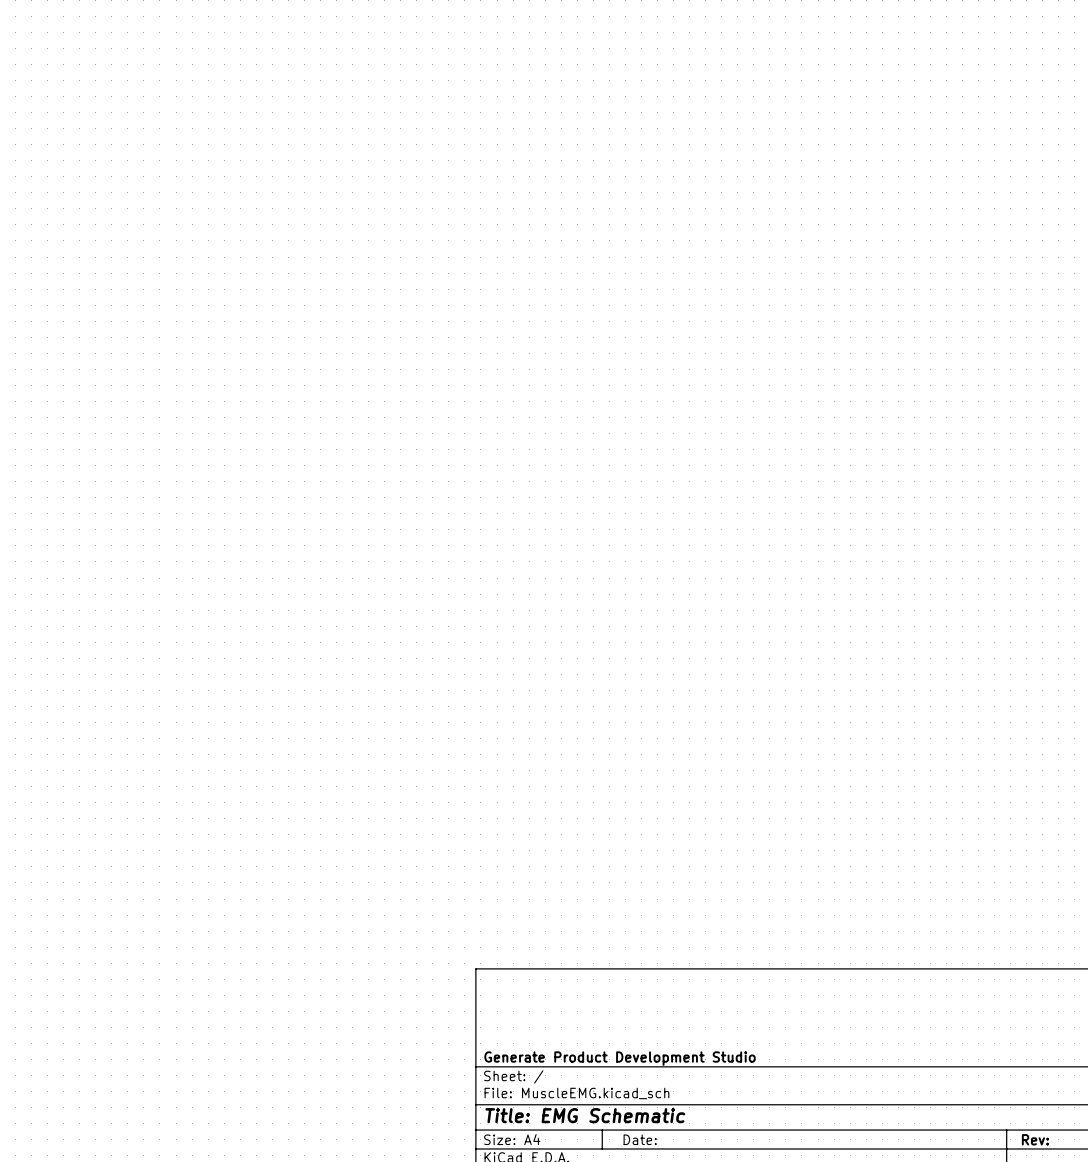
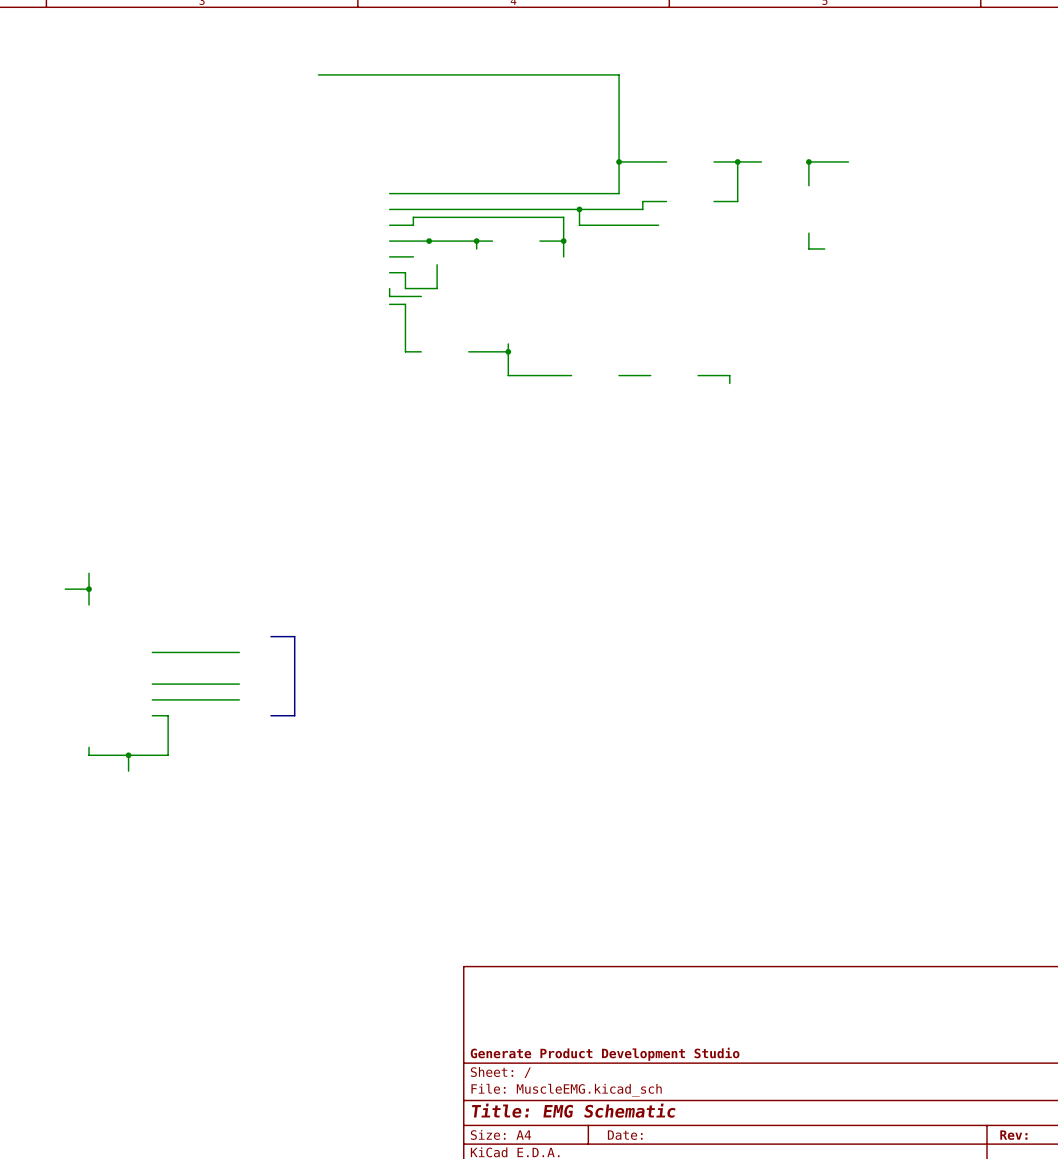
wire: none -> (318, 74) (619, 74) (619, 193) (389, 193)
wire: none -> (619, 161) (666, 161)
junction: none -> (619, 161)
wire: none -> (713, 161) (761, 161)
wire: none -> (737, 161) (737, 201) (713, 201)
junction: none -> (737, 161)
junction: none -> (808, 161)
wire: none -> (848, 161) (808, 161) (808, 185)
wire: none -> (666, 201) (642, 201) (642, 209) (389, 209)
wire: none -> (579, 209) (579, 225) (658, 225)
junction: none -> (579, 209)
wire: none -> (389, 225) (413, 225) (413, 217) (563, 217) (563, 256)
wire: none -> (808, 233) (808, 248) (824, 248)
wire: none -> (389, 241) (492, 241)
junction: none -> (429, 241)
wire: none -> (476, 241) (476, 248)
junction: none -> (476, 241)
wire: none -> (539, 241) (563, 241)
junction: none -> (563, 241)
wire: none -> (389, 256) (413, 256)
wire: none -> (437, 264) (437, 288) (405, 288) (405, 272) (389, 272)
wire: none -> (389, 288) (389, 296) (421, 296)
wire: none -> (389, 304) (405, 304) (405, 351) (421, 351)
wire: none -> (508, 343) (508, 375) (571, 375)
wire: none -> (468, 351) (508, 351)
junction: none -> (508, 351)
wire: none -> (619, 375) (650, 375)
wire: none -> (698, 375) (729, 375) (729, 383)
wire: none -> (89, 573) (89, 604)
wire: none -> (65, 589) (89, 589)
junction: none -> (89, 589)
bus: none -> (270, 636) (294, 636) (294, 715) (270, 715)
wire: none -> (152, 652) (239, 652)
wire: none -> (152, 684) (239, 684)
wire: none -> (152, 699) (239, 699)
wire: none -> (152, 715) (168, 715) (168, 755) (89, 755) (89, 747)
wire: none -> (128, 755) (128, 771)
junction: none -> (128, 755)

